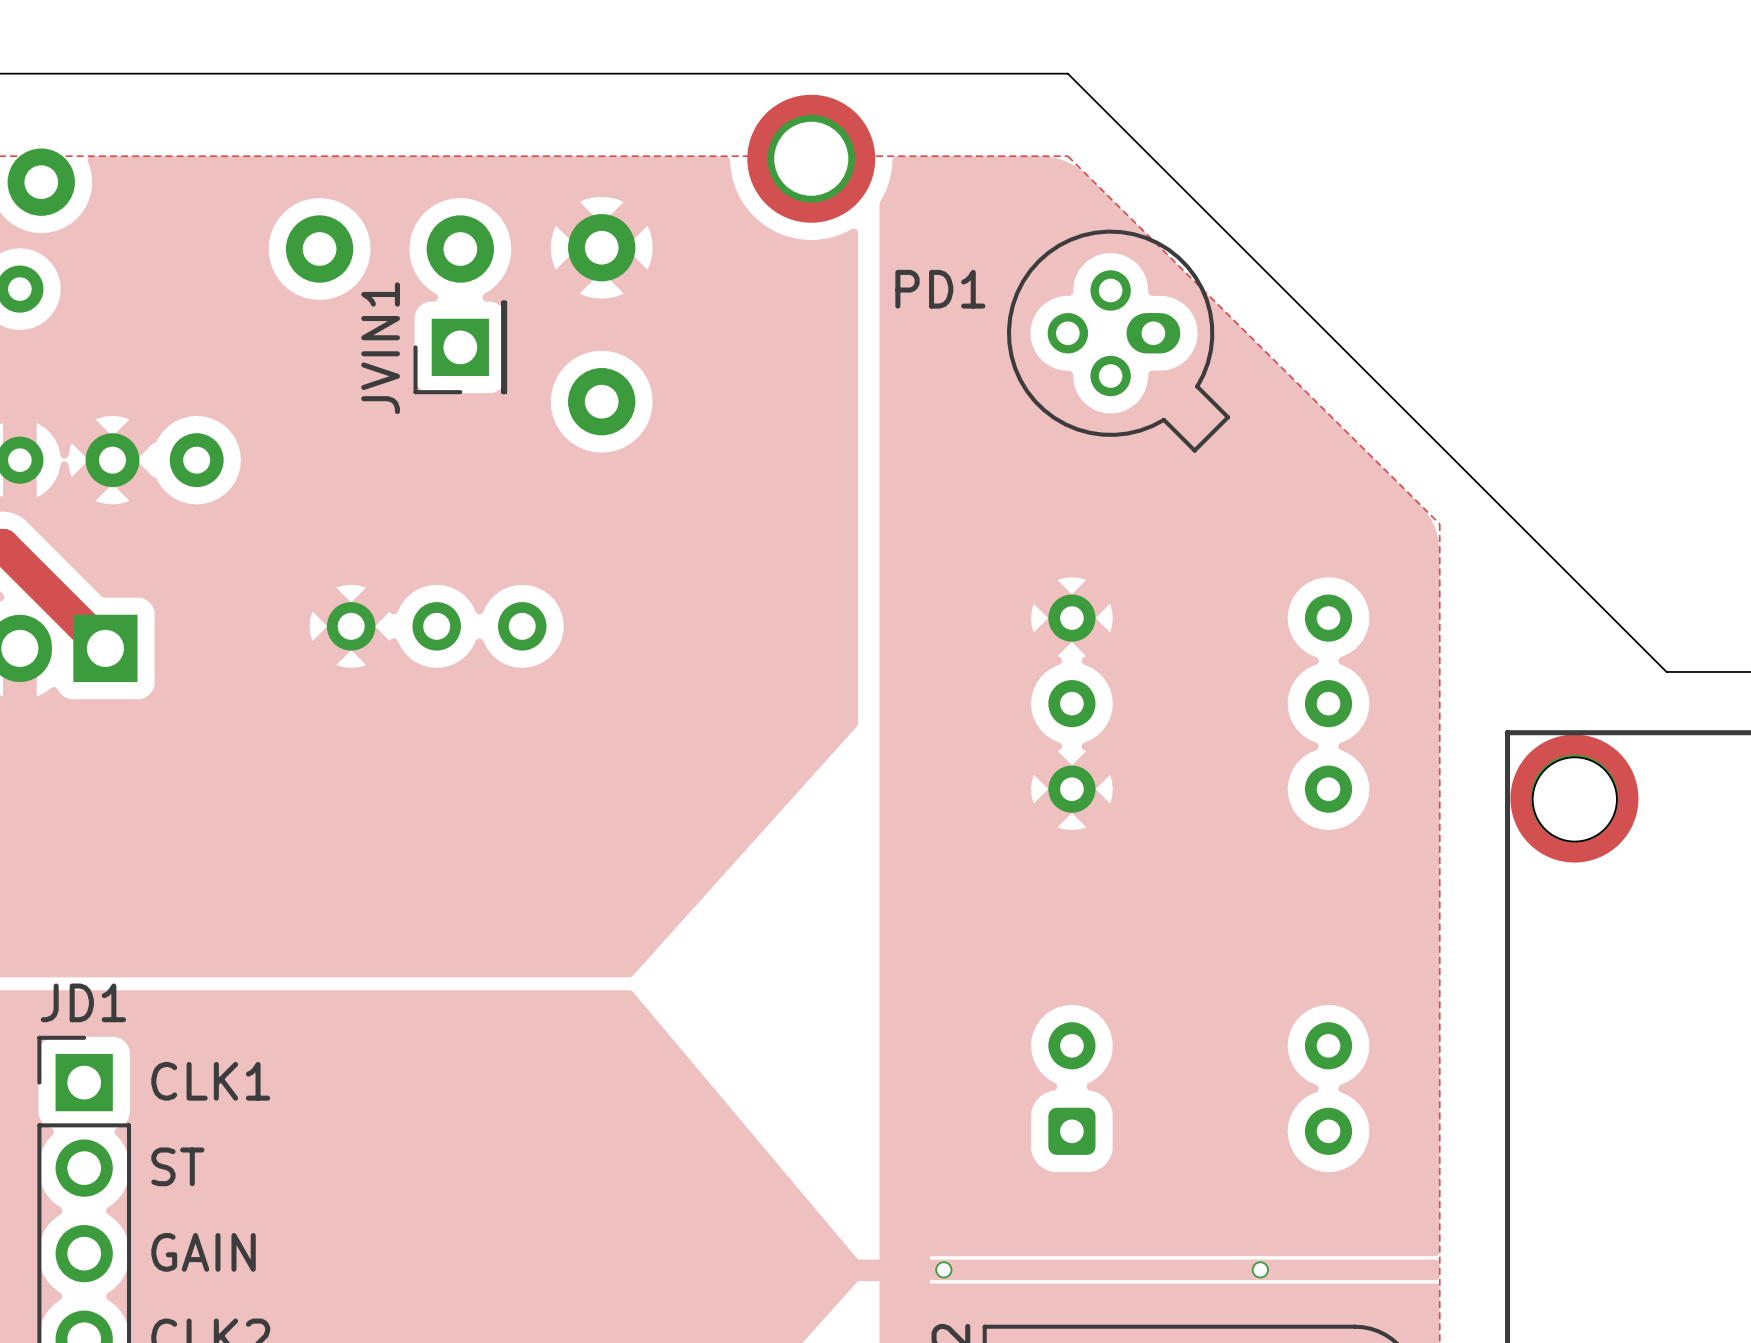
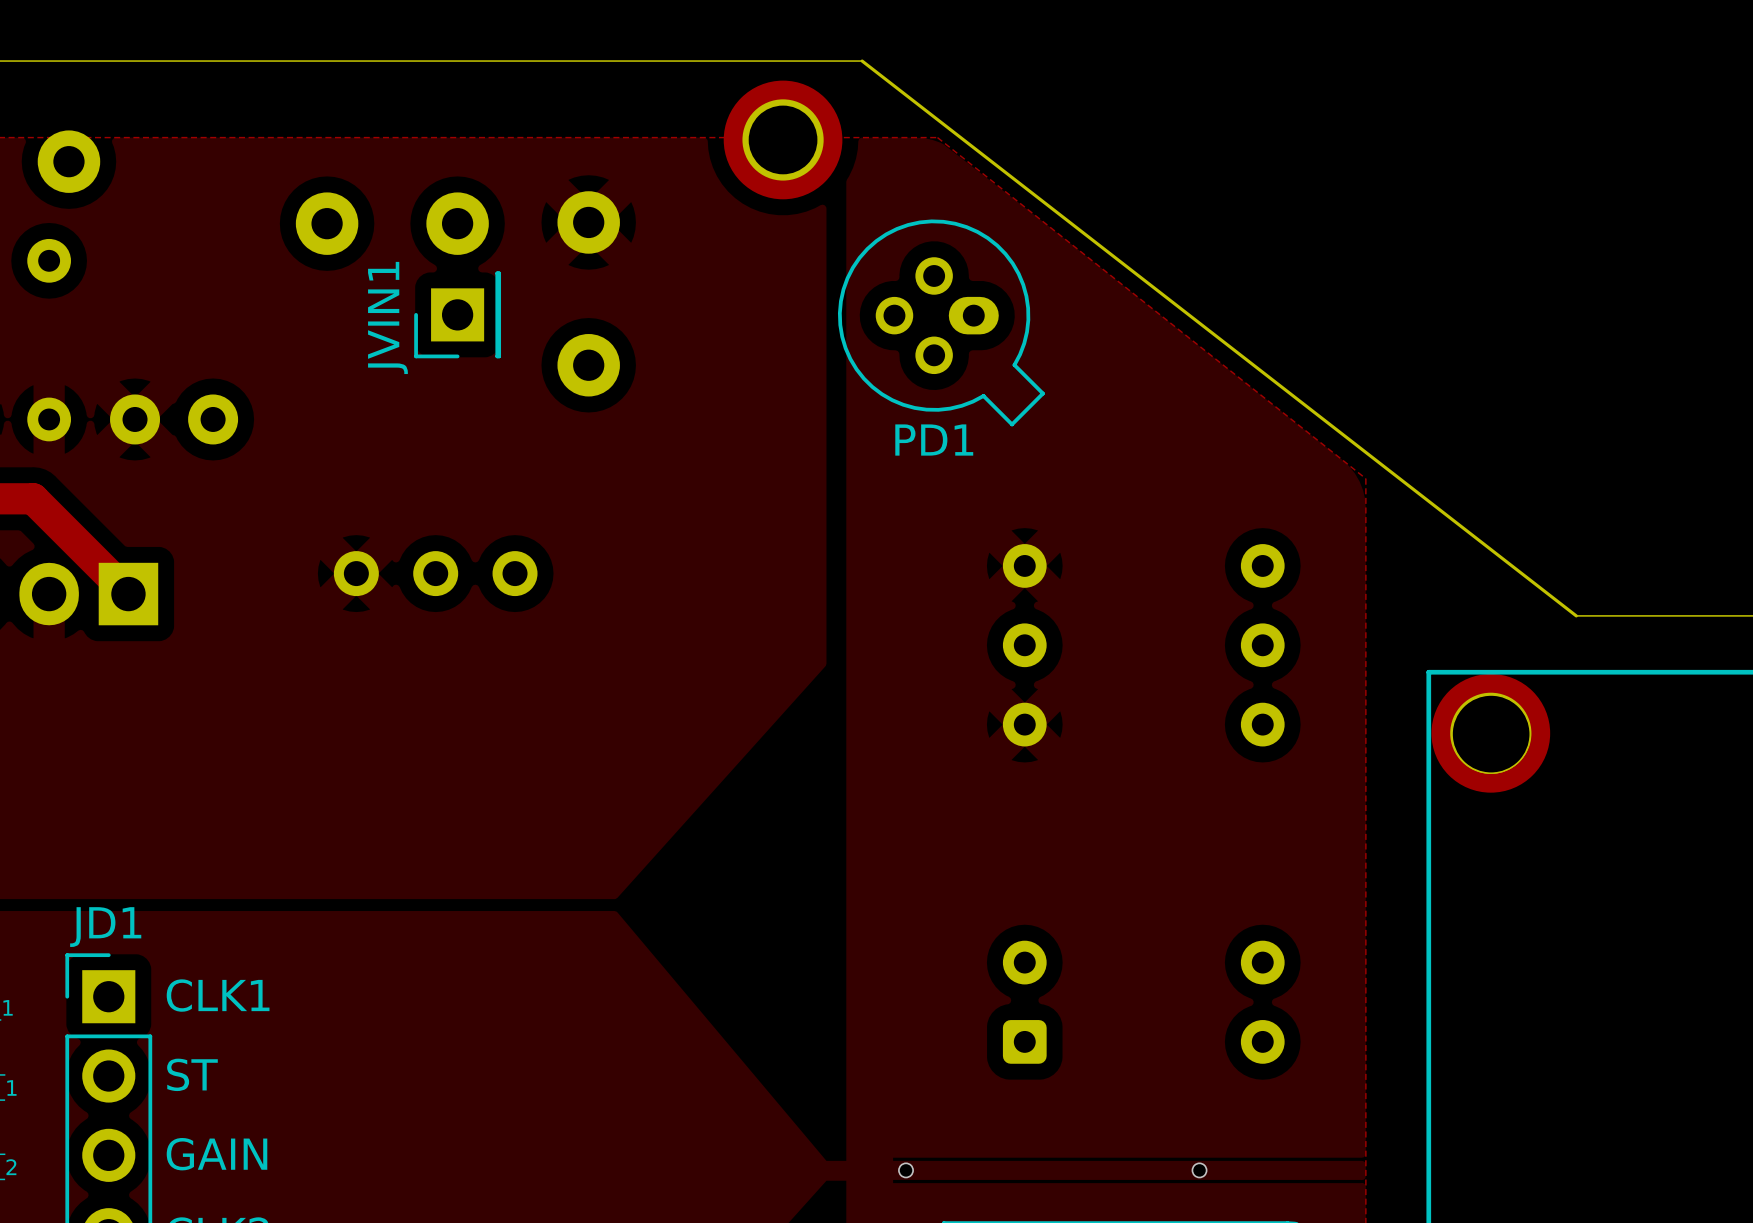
board edge: (896, 73) (1067, 73) (1666, 671) -> (862, 61) (1576, 615)
zone outline: (977, 156) (1067, 156) (1439, 524) -> (937, 137) (1365, 478)
PD1 name position: PD1 (940, 289) -> PD1 (934, 440)
PD1 position: (1118, 341) -> (941, 322)

